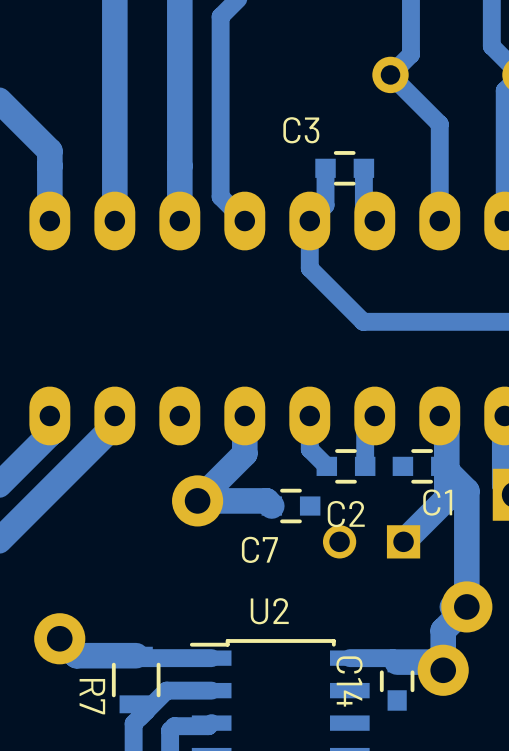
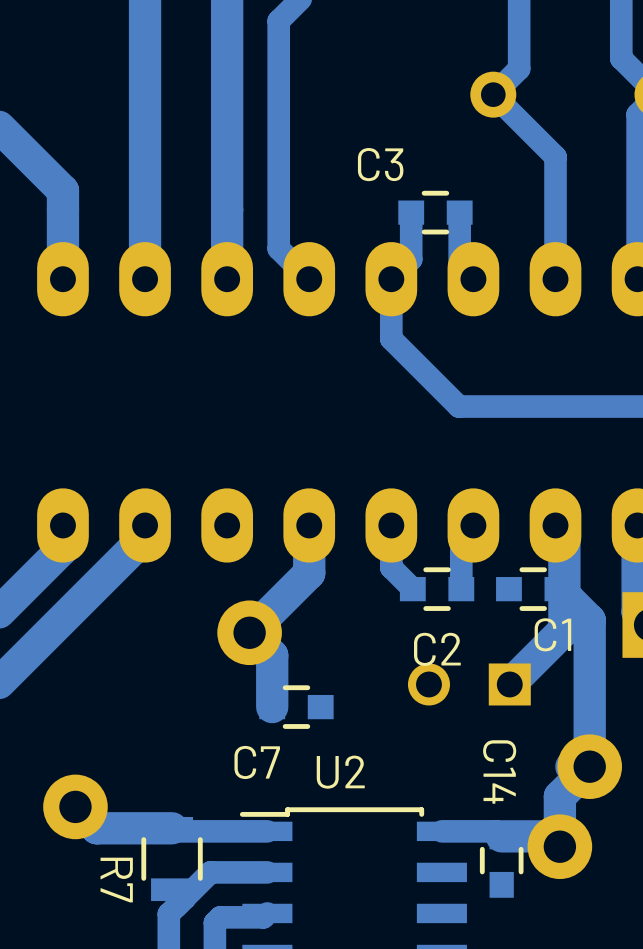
track: (197, 500) (266, 500) (271, 506) -> (249, 632) (272, 655) (272, 707)
C7 position: (290, 506) -> (296, 707)
C14 name position: C14 (349, 681) -> C14 (499, 771)

